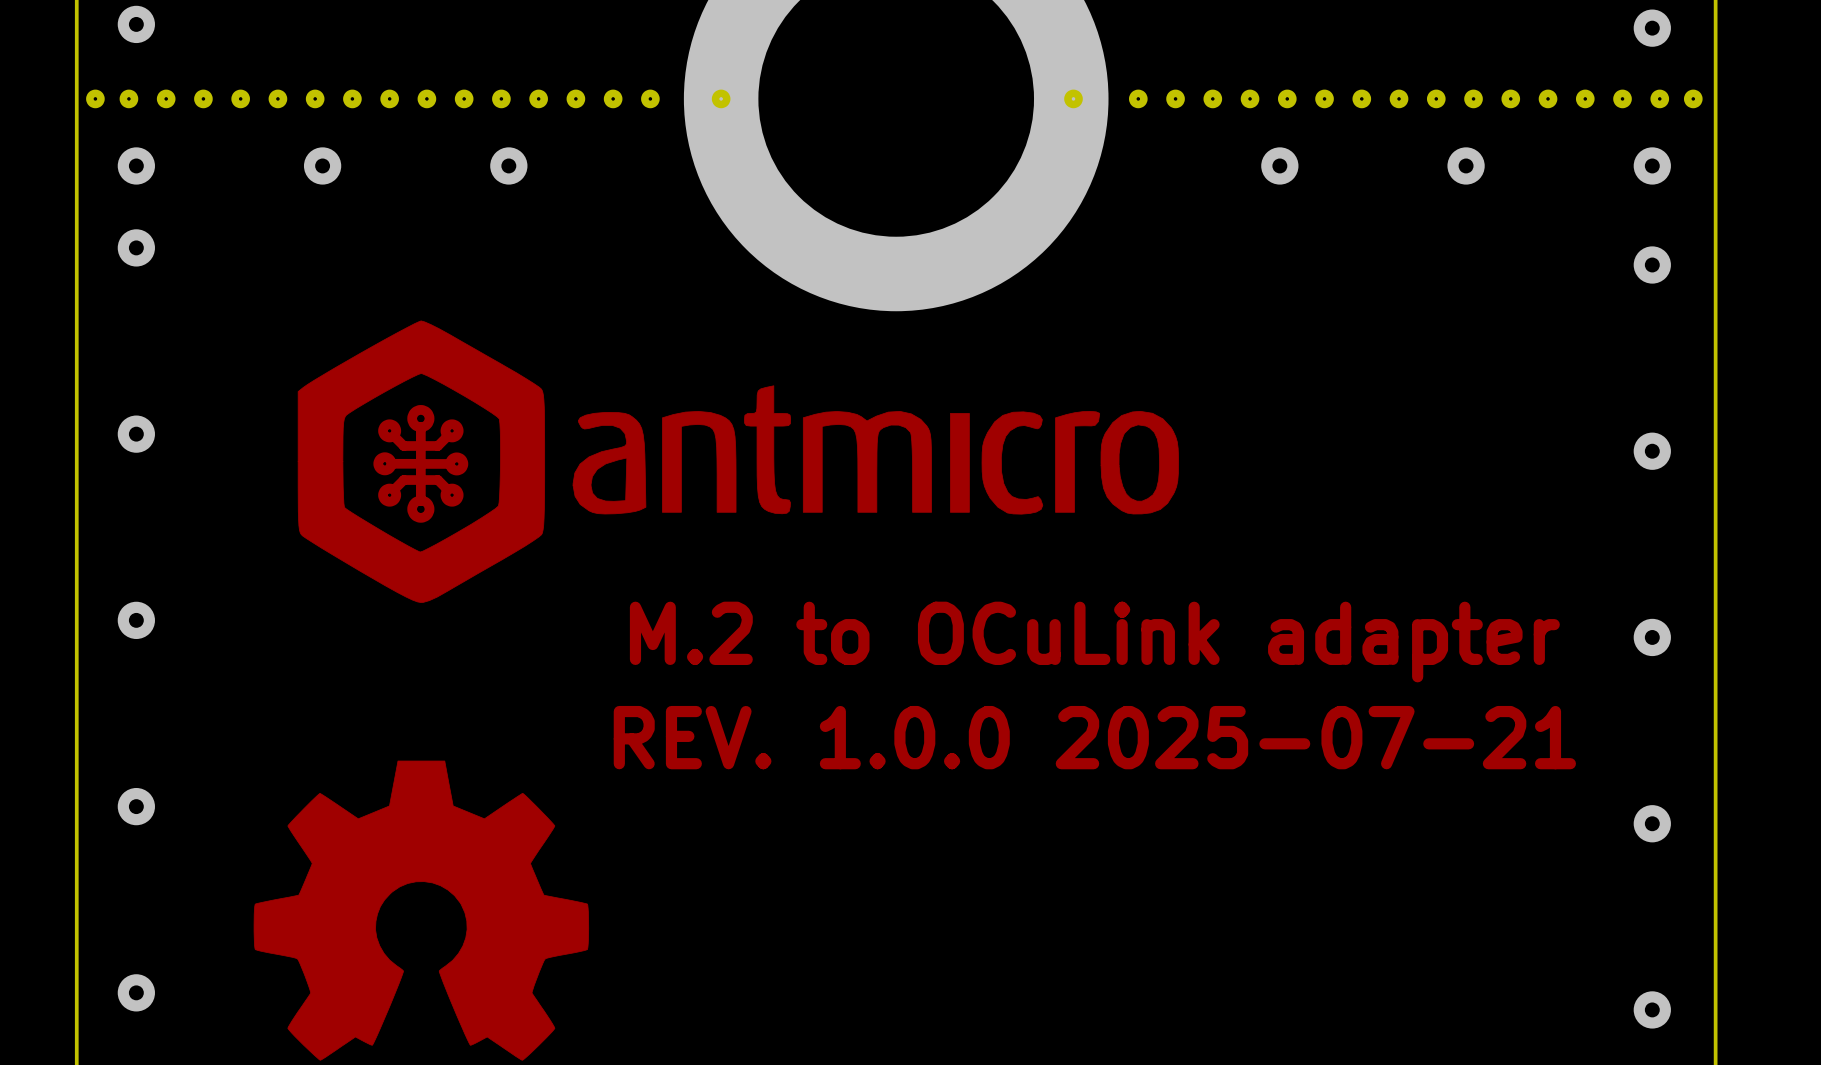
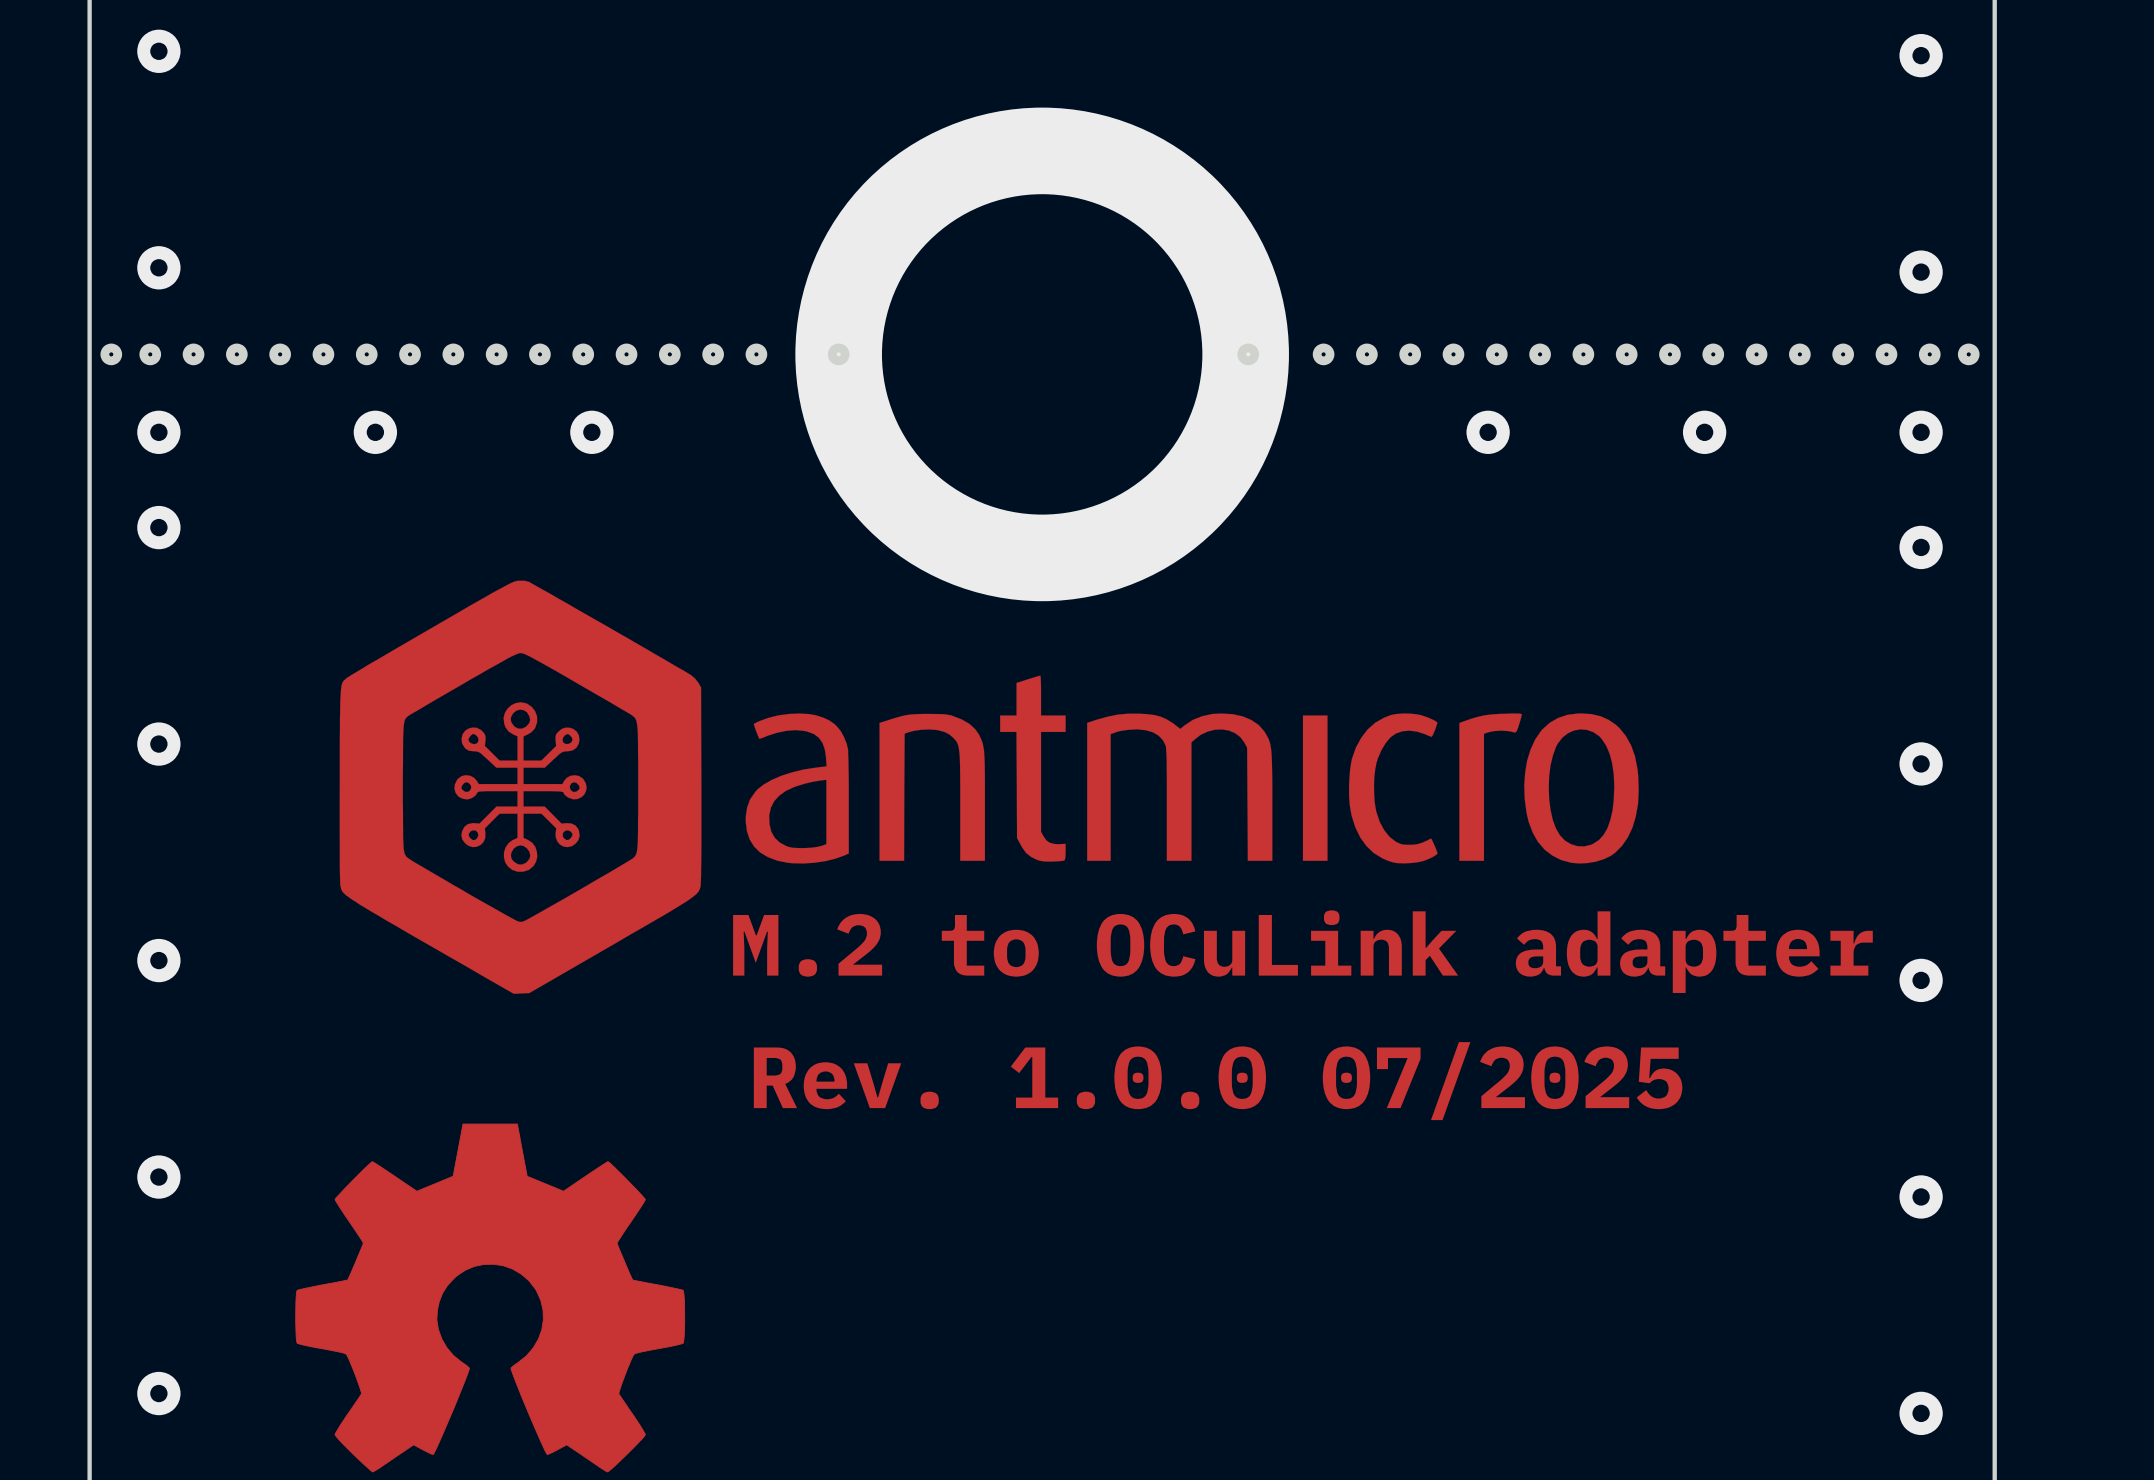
drawing: none -> [339, 580, 1639, 994]
drawing: [297, 320, 1179, 603] -> none
text position: M.2 to OCuLink adapter (1094, 642) -> M.2 to OCuLink adapter (1302, 951)
text: REV. 1.0.0 2025-07-21 (1094, 737) -> Rev. 1.0.0 07/2025 (1218, 1081)

